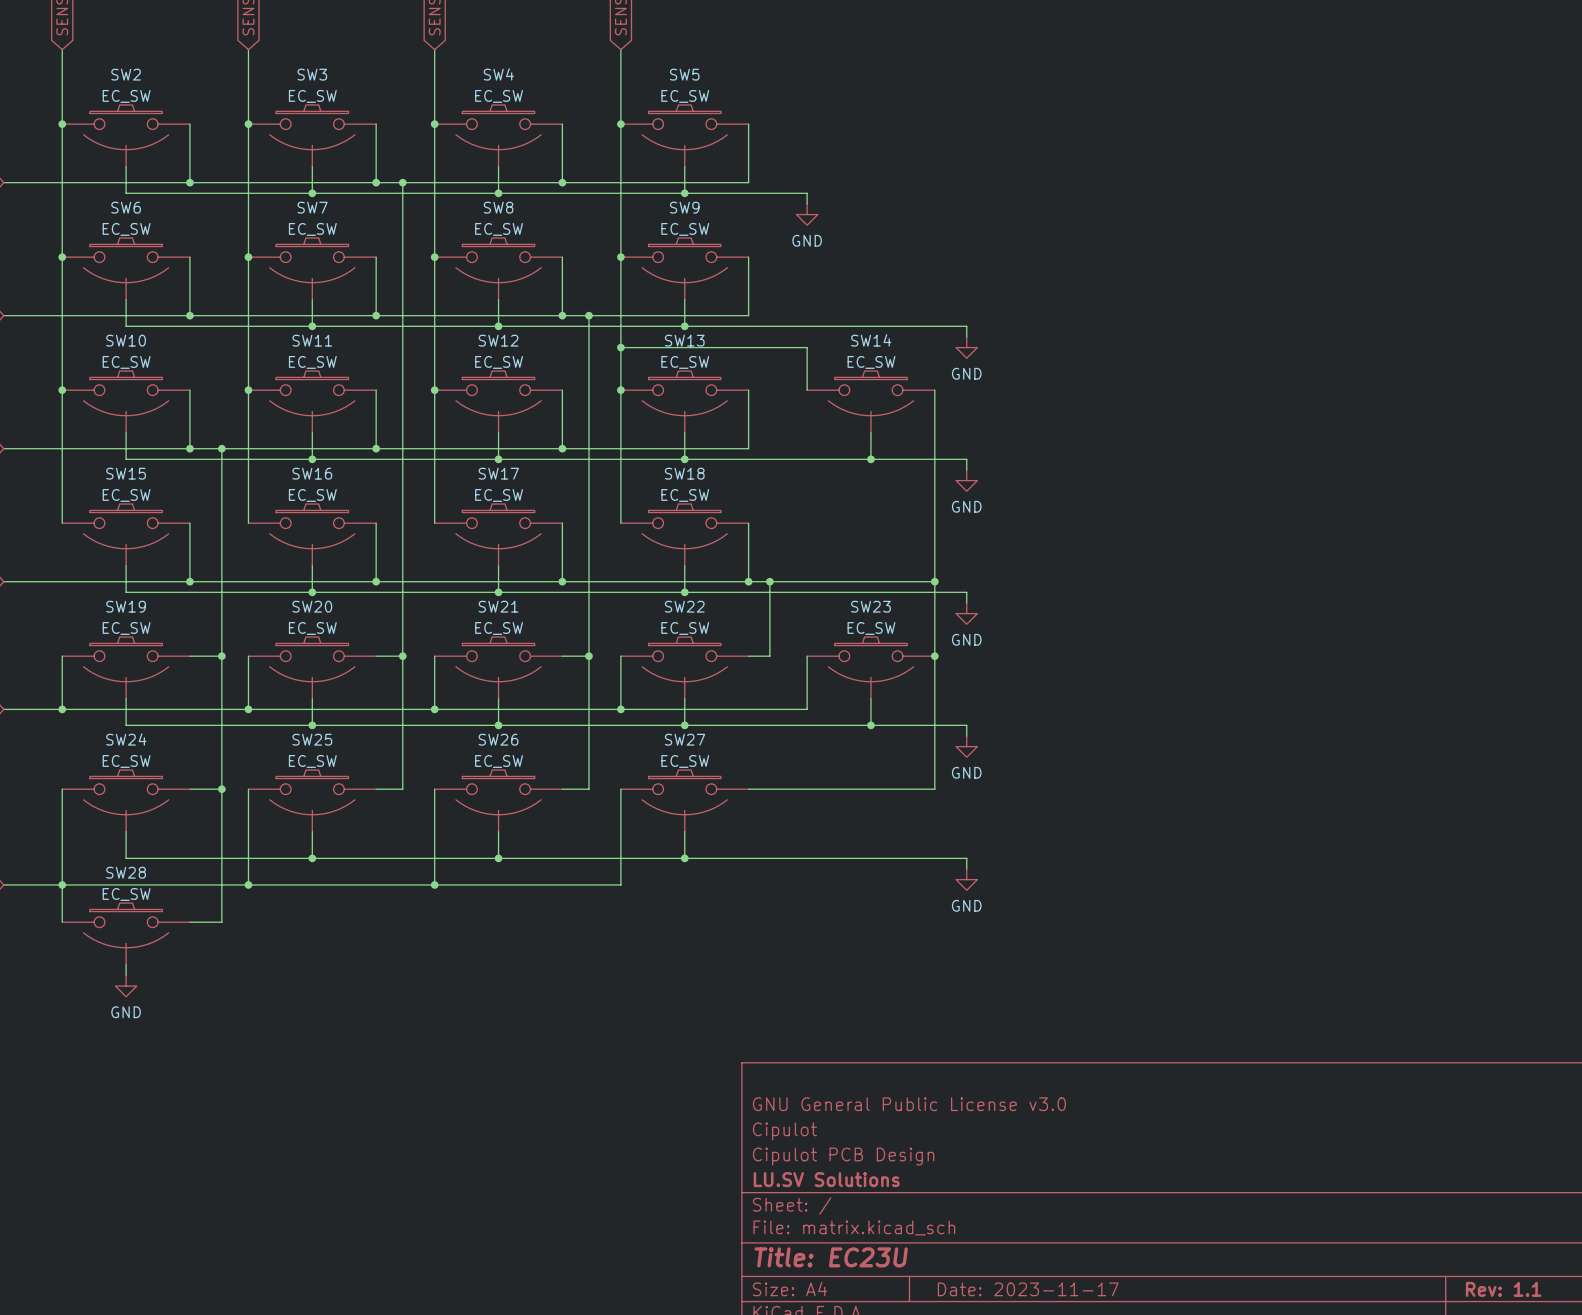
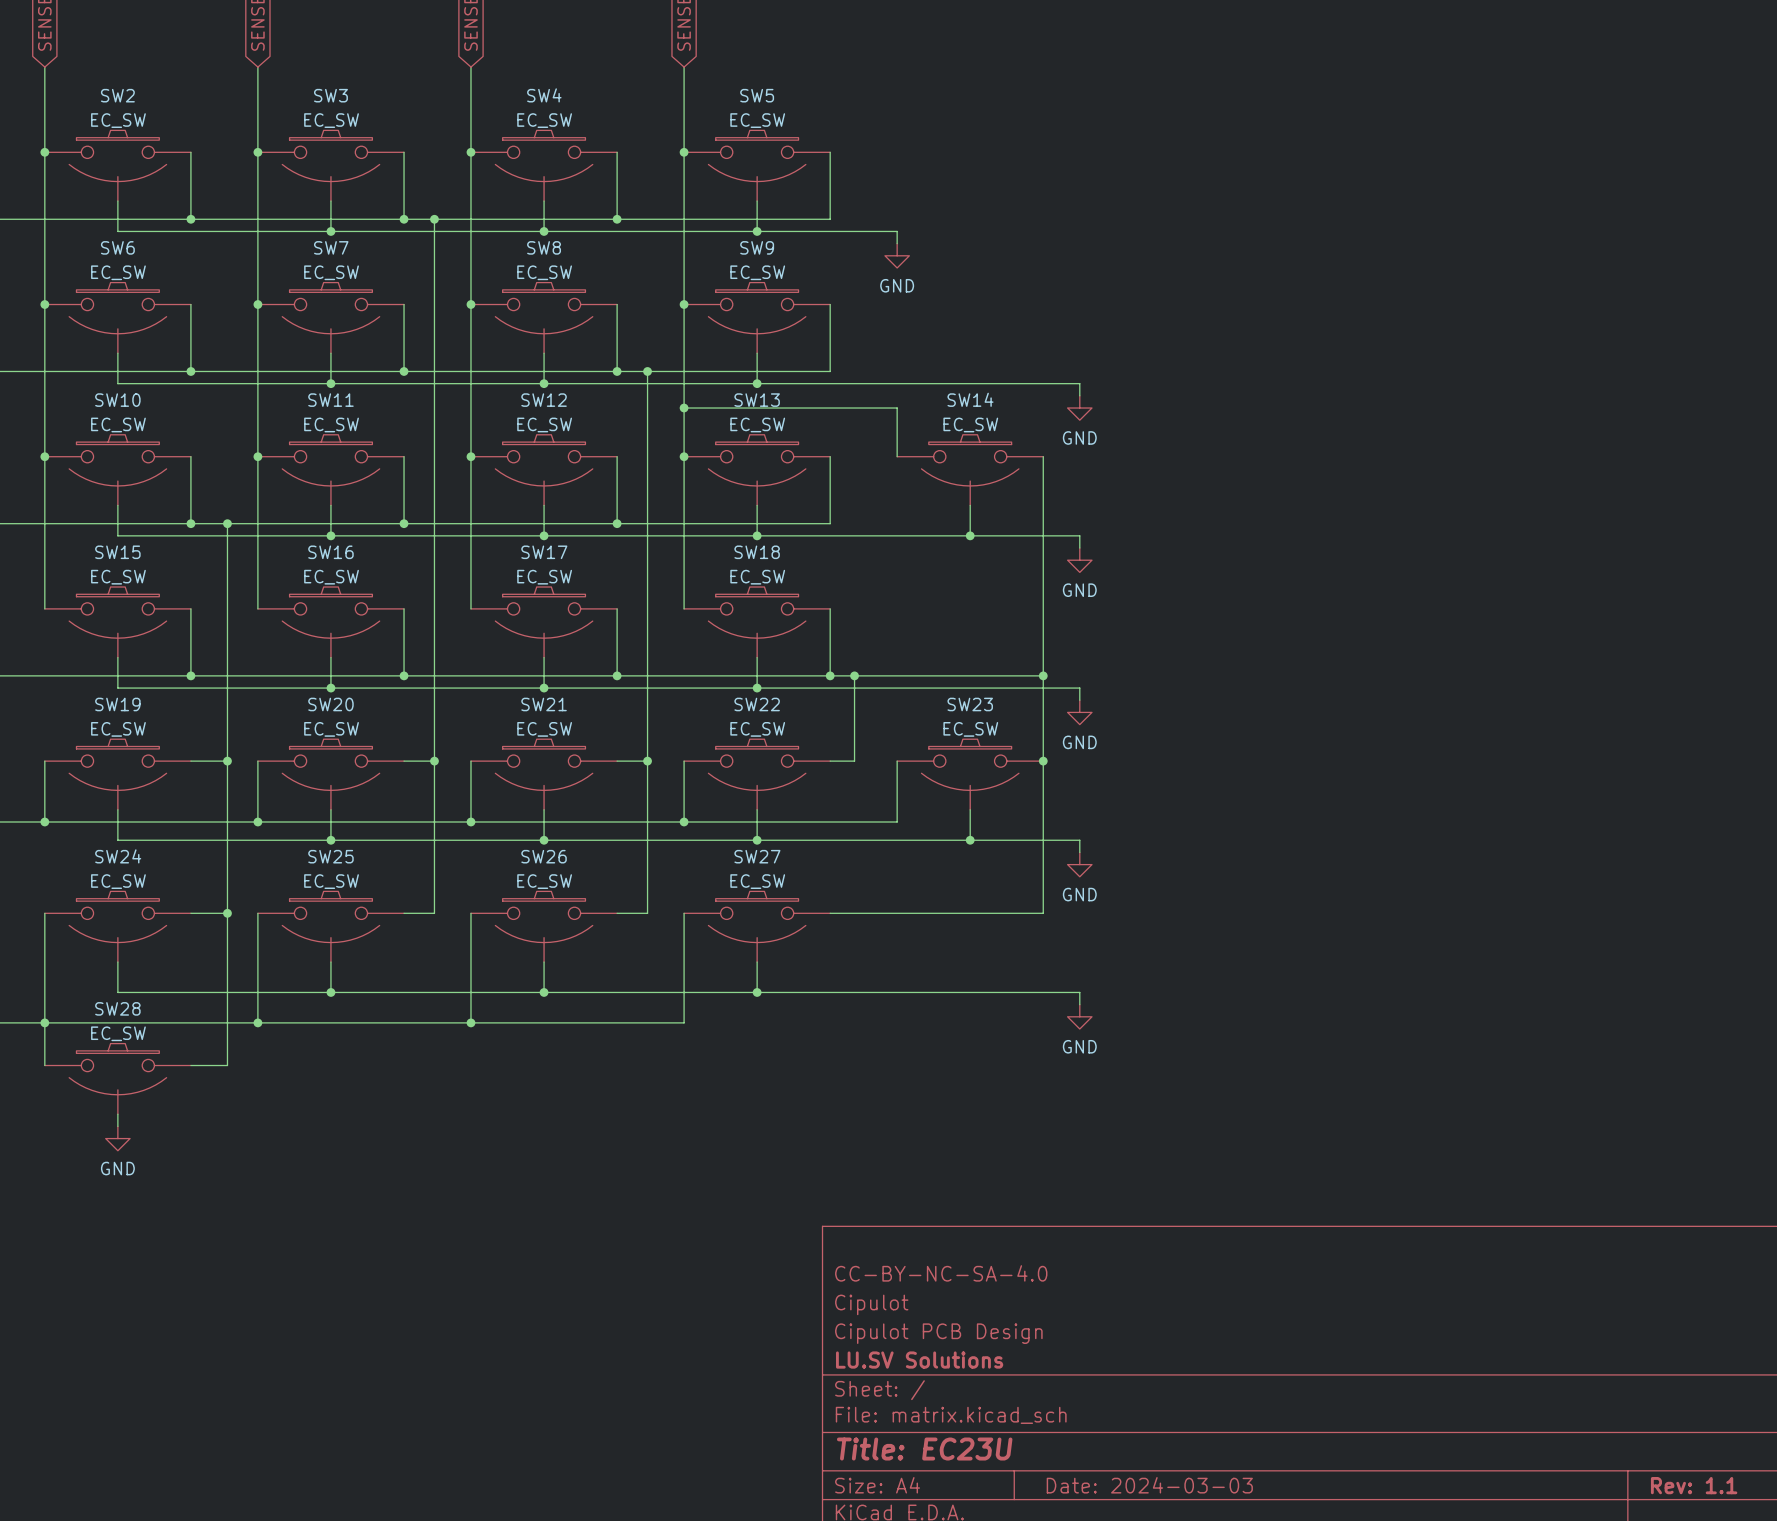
title block: GNU General Public License v3.0 (909, 1104) -> CC-BY-NC-SA-4.0 (941, 1273)
title block: Date: 2023-11-17 (1028, 1289) -> Date: 2024-03-03 (1149, 1485)

